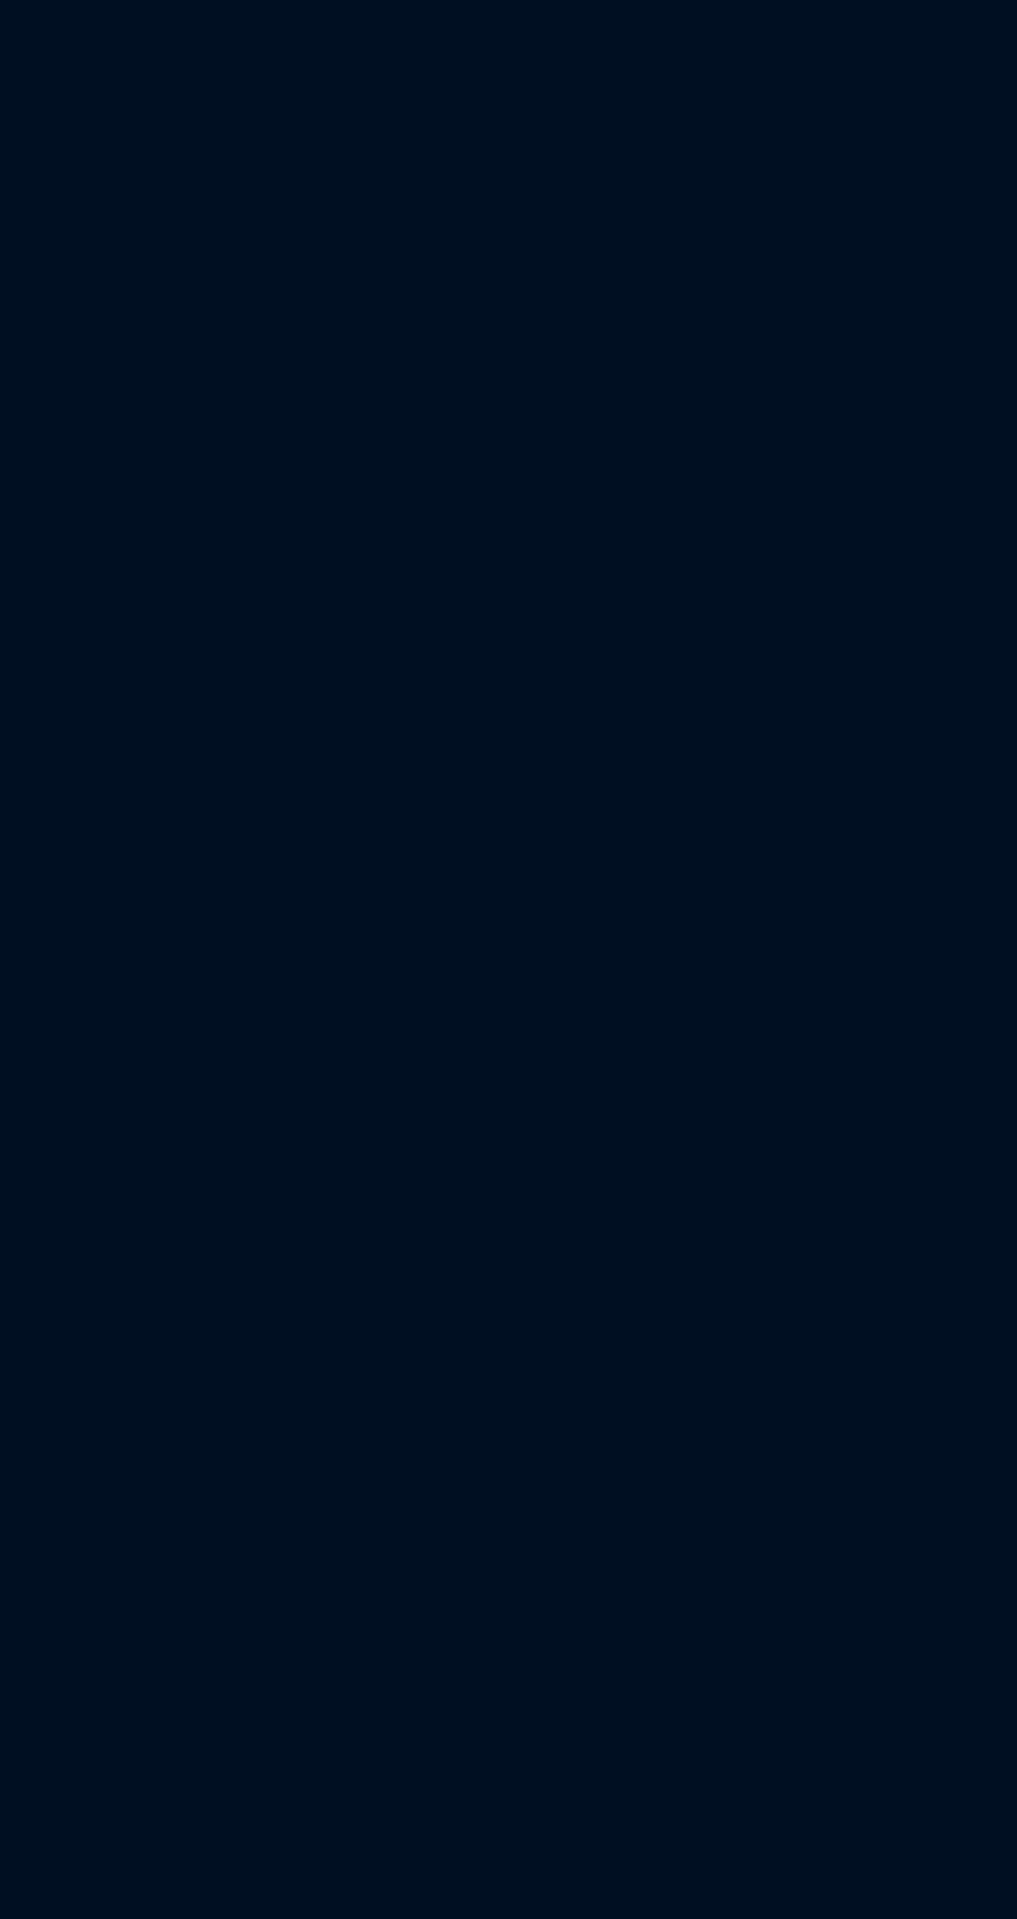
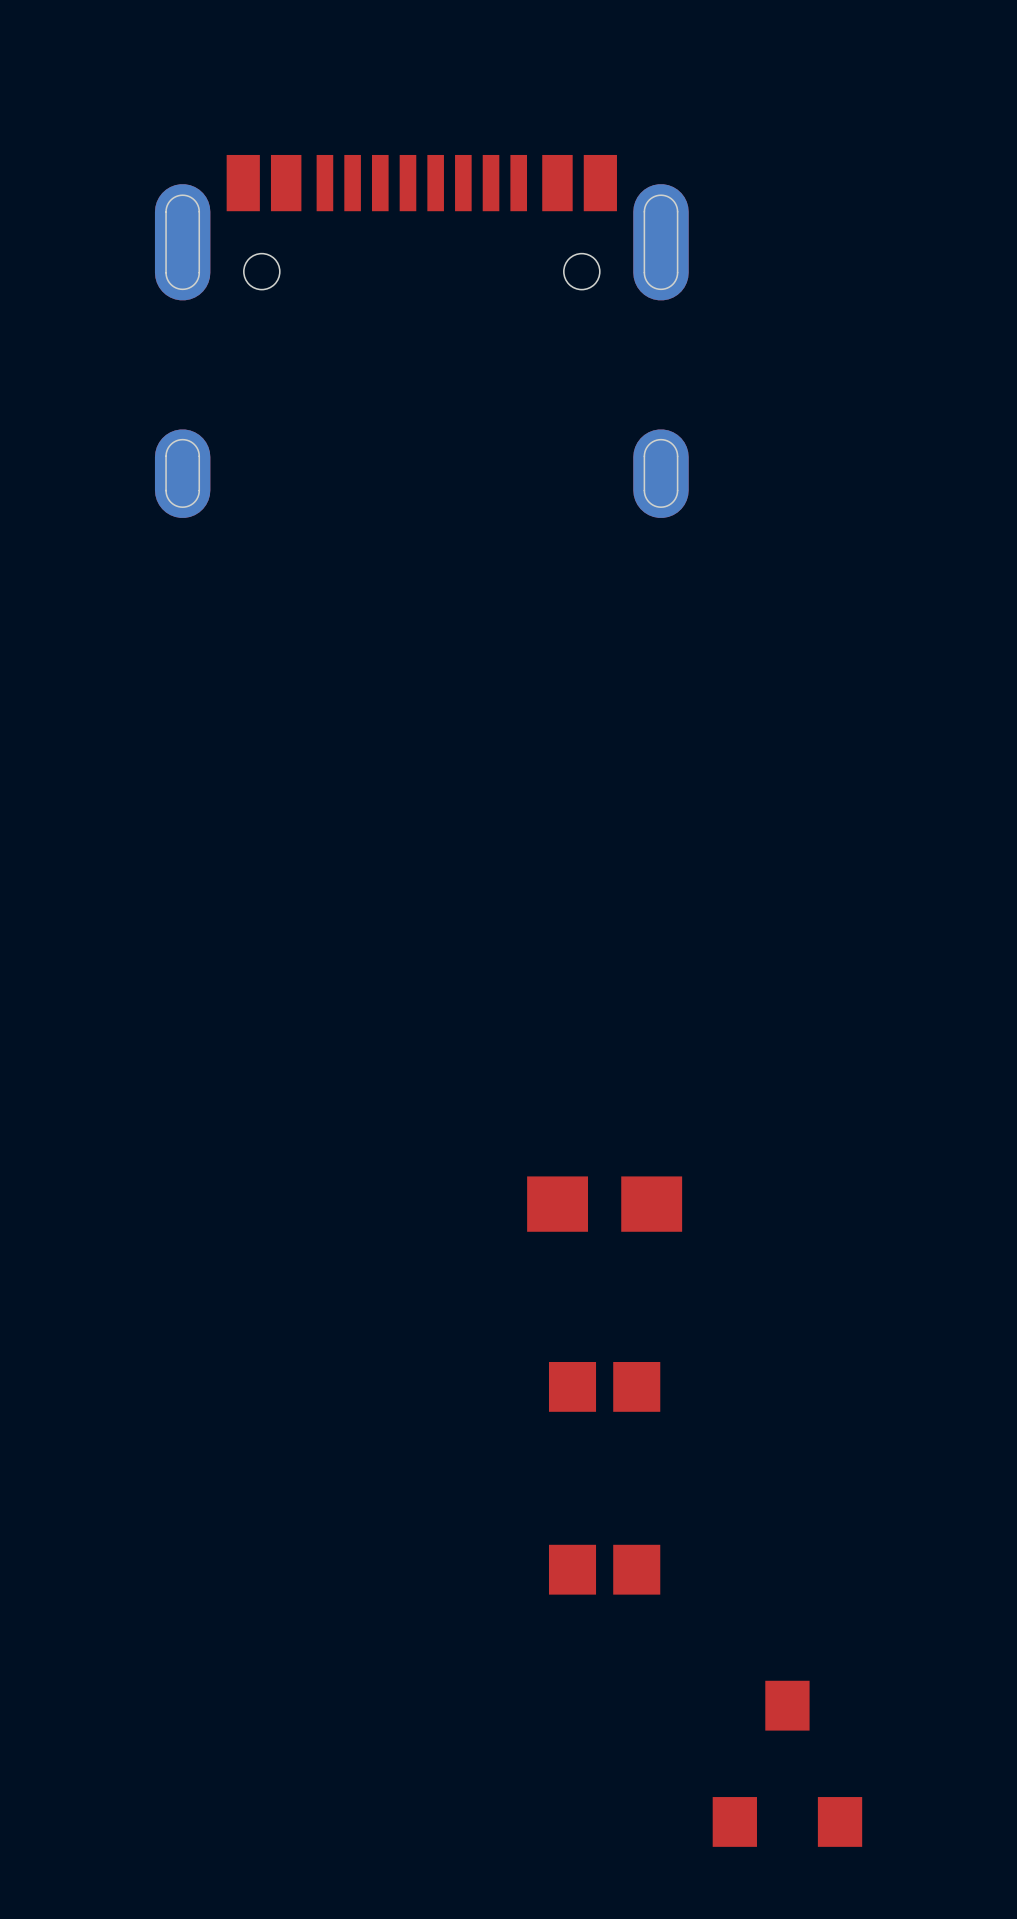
part: none -> (421, 336)
part: none -> (604, 1204)
part: none -> (604, 1386)
part: none -> (604, 1569)
part: none -> (787, 1763)

